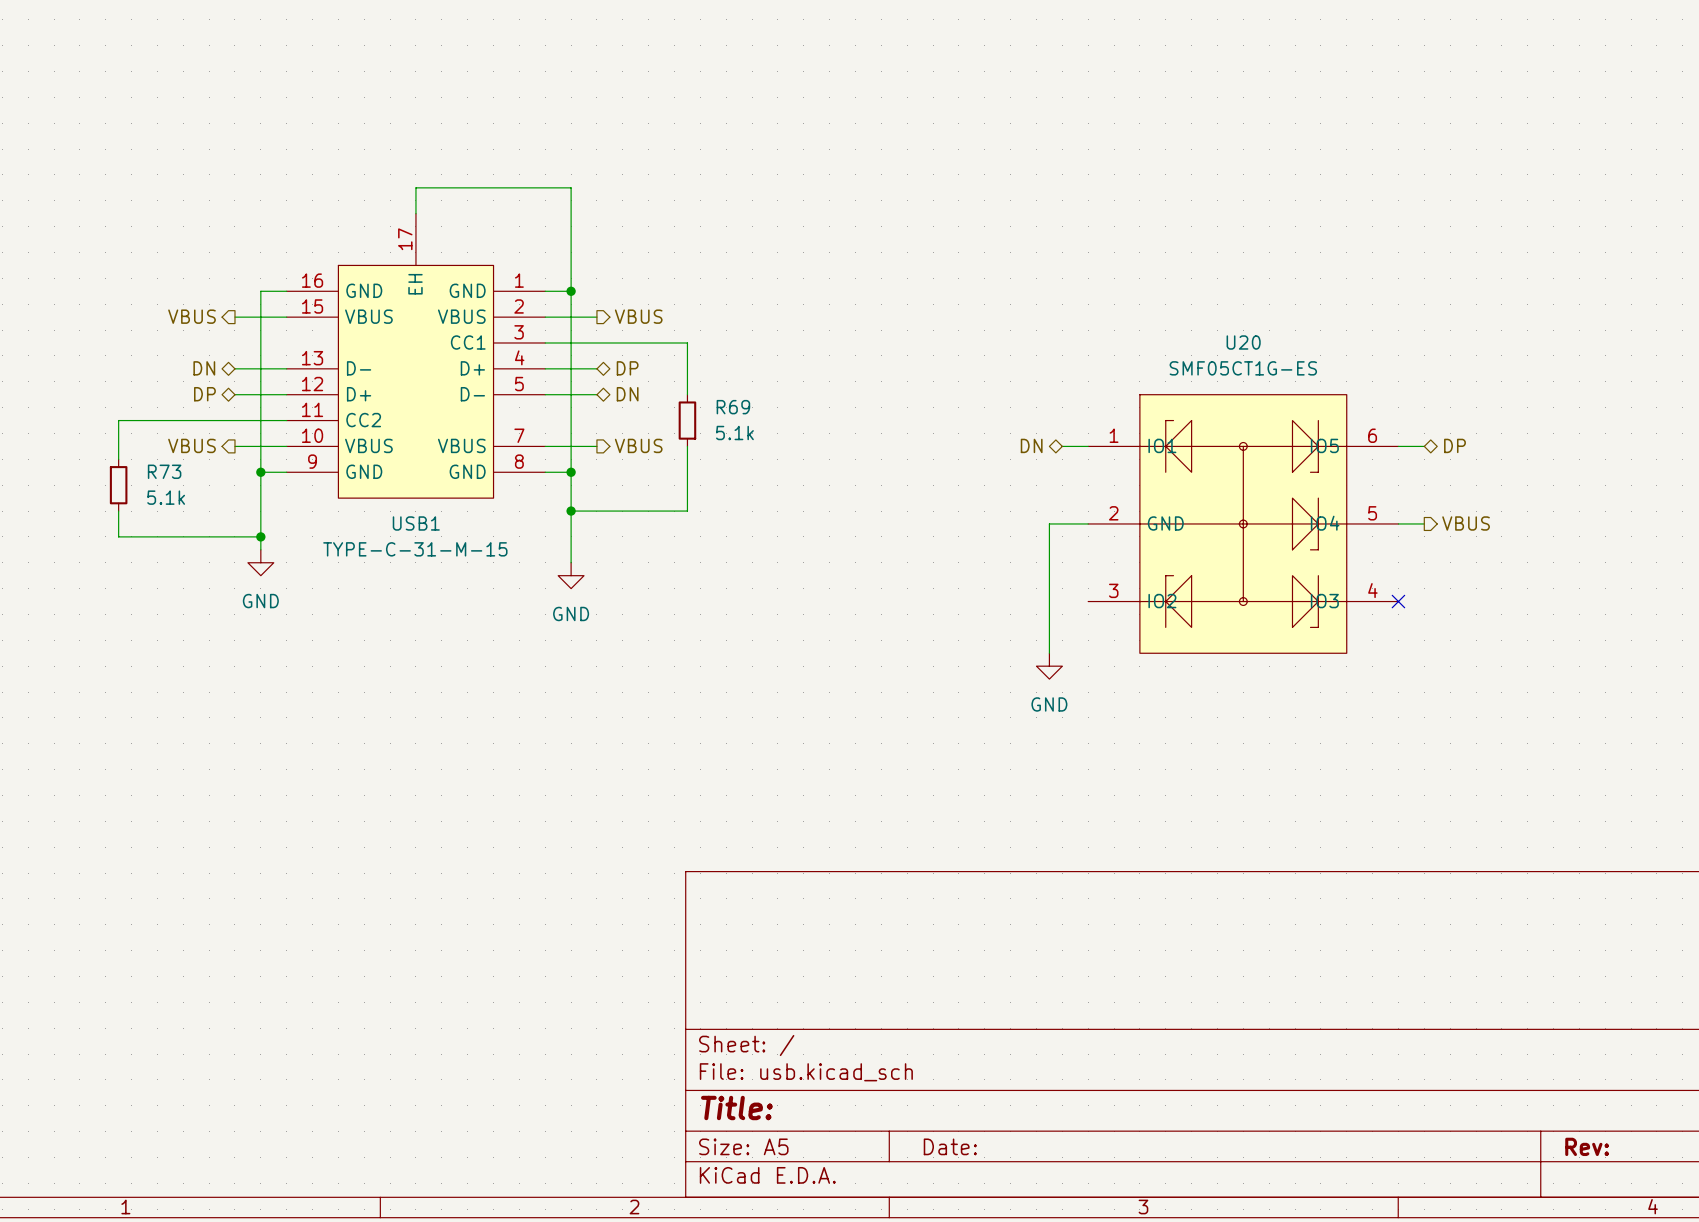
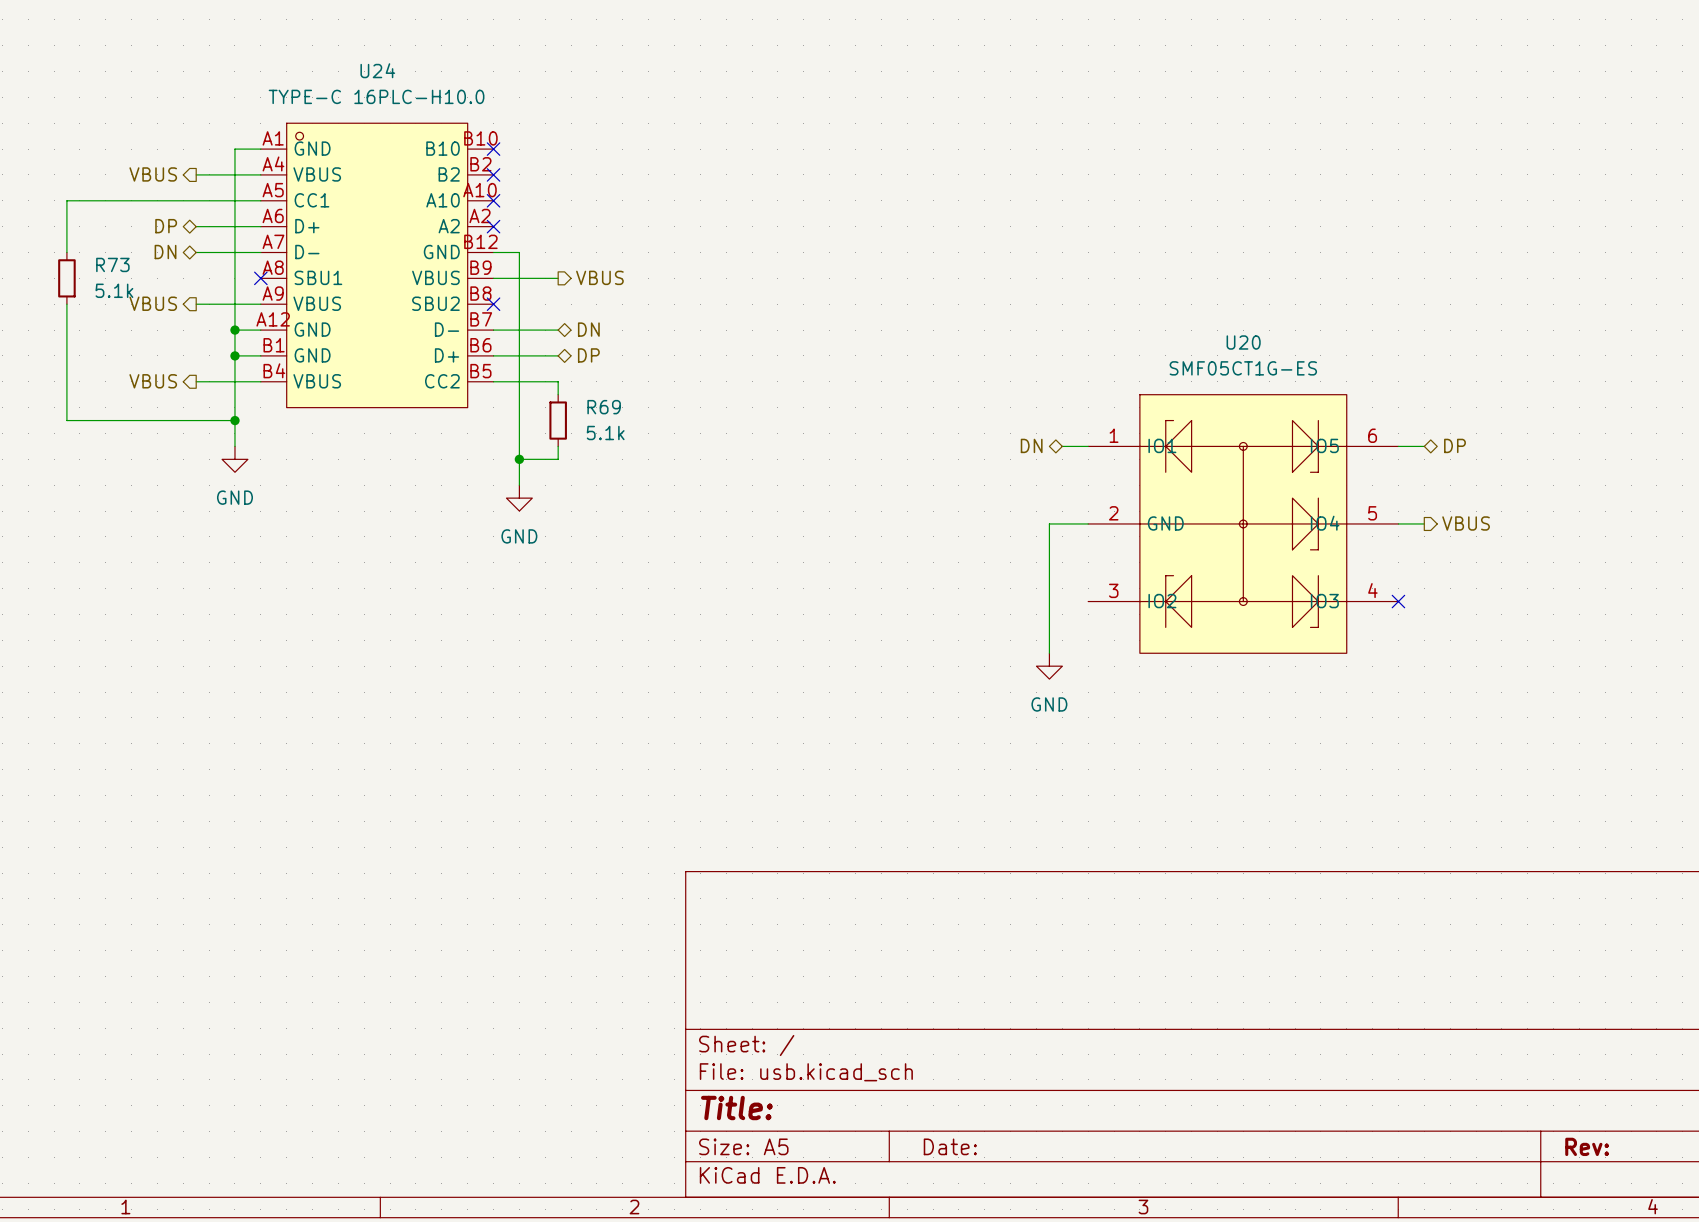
no-connect mark: none -> (493, 149)
hierarchical label: none -> VBUS (153, 174)
wire: none -> (196, 174) (260, 174)
no-connect mark: none -> (493, 174)
wire: none -> (260, 200) (66, 200) (66, 252)
no-connect mark: none -> (493, 200)
wire: (415, 213) (415, 187) (571, 187) (571, 562) -> none
wire: none -> (196, 226) (260, 226)
no-connect mark: none -> (493, 226)
wire: none -> (196, 252) (260, 252)
wire: none -> (493, 252) (519, 252) (519, 485)
U24: none -> TYPE-C 16PLC-H10.0 (377, 265)
no-connect mark: none -> (260, 278)
wire: none -> (493, 278) (558, 278)
wire: (286, 291) (260, 291) (260, 549) -> none
wire: (545, 291) (571, 291) -> none
junction: (571, 291) -> none
wire: none -> (196, 304) (260, 304)
no-connect mark: none -> (493, 304)
hierarchical label position: VBUS (192, 316) -> VBUS (153, 303)
hierarchical label position: VBUS (638, 316) -> VBUS (599, 277)
wire: (234, 317) (286, 317) -> none
wire: (545, 317) (596, 317) -> none
wire: none -> (234, 330) (260, 330)
junction: none -> (234, 330)
wire: none -> (493, 330) (558, 330)
wire: (545, 342) (687, 342) (687, 394) -> none
junction: none -> (234, 355)
USB1: TYPE-C-31-M-15 (415, 355) -> none
wire: none -> (493, 355) (558, 355)
hierarchical label position: DN (204, 368) -> DN (165, 252)
wire: (234, 368) (286, 368) -> none
wire: (545, 368) (596, 368) -> none
hierarchical label position: DP (627, 368) -> DP (588, 355)
hierarchical label: none -> VBUS (153, 381)
wire: none -> (196, 381) (260, 381)
wire: none -> (493, 381) (558, 381) (558, 394)
hierarchical label position: DP (204, 394) -> DP (166, 226)
wire: (234, 394) (286, 394) -> none
wire: (545, 394) (596, 394) -> none
hierarchical label position: DN (627, 394) -> DN (588, 329)
wire: (118, 420) (118, 459) -> (118, 420) (66, 420) (66, 304)
wire: (234, 420) (286, 420) -> none
R69 position: (687, 420) -> (558, 420)
hierarchical label: VBUS (192, 445) -> none
hierarchical label: VBUS (638, 445) -> none
wire: (234, 446) (286, 446) -> (234, 446) (234, 149) (260, 149)
wire: (545, 446) (596, 446) -> none
wire: none -> (558, 446) (558, 459) (519, 459)
wire: (687, 446) (687, 511) (571, 511) -> none
junction: none -> (519, 459)
wire: (260, 472) (286, 472) -> (234, 355) (260, 355)
junction position: (260, 472) -> (234, 420)
wire: (545, 472) (571, 472) -> none
junction: (571, 472) -> none
R73 position: (118, 485) -> (66, 278)
wire: (118, 511) (118, 536) (260, 536) -> none
junction: (571, 511) -> none
junction: (260, 536) -> none
power symbol position: GND (260, 562) -> GND (234, 459)
power symbol position: GND (571, 575) -> GND (519, 498)

